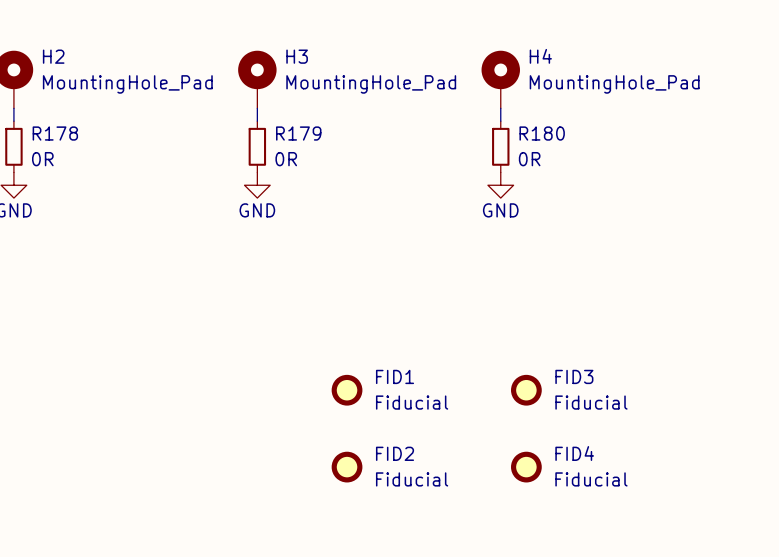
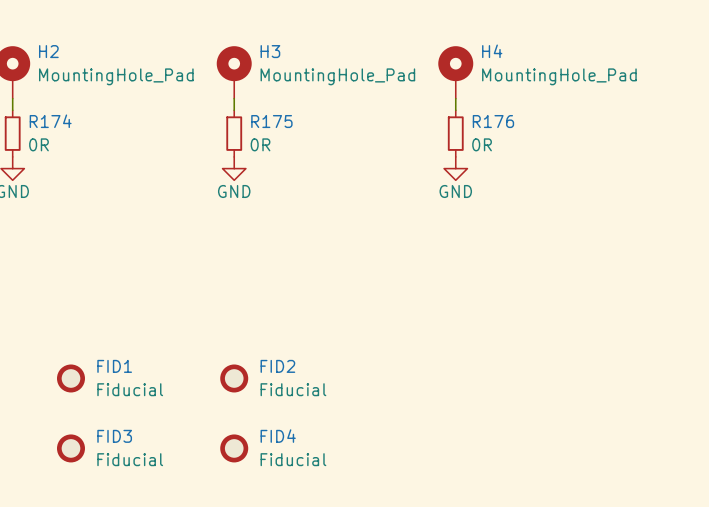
R178 name: R178 (55, 133) -> R174 (50, 121)
R179 name: R179 (298, 133) -> R175 (271, 121)
R180 name: R180 (542, 133) -> R176 (493, 121)
FID1 position: (347, 390) -> (70, 378)
FID3 position: (526, 390) -> (70, 448)
FID2 position: (347, 467) -> (234, 378)
FID4 position: (526, 467) -> (234, 448)

